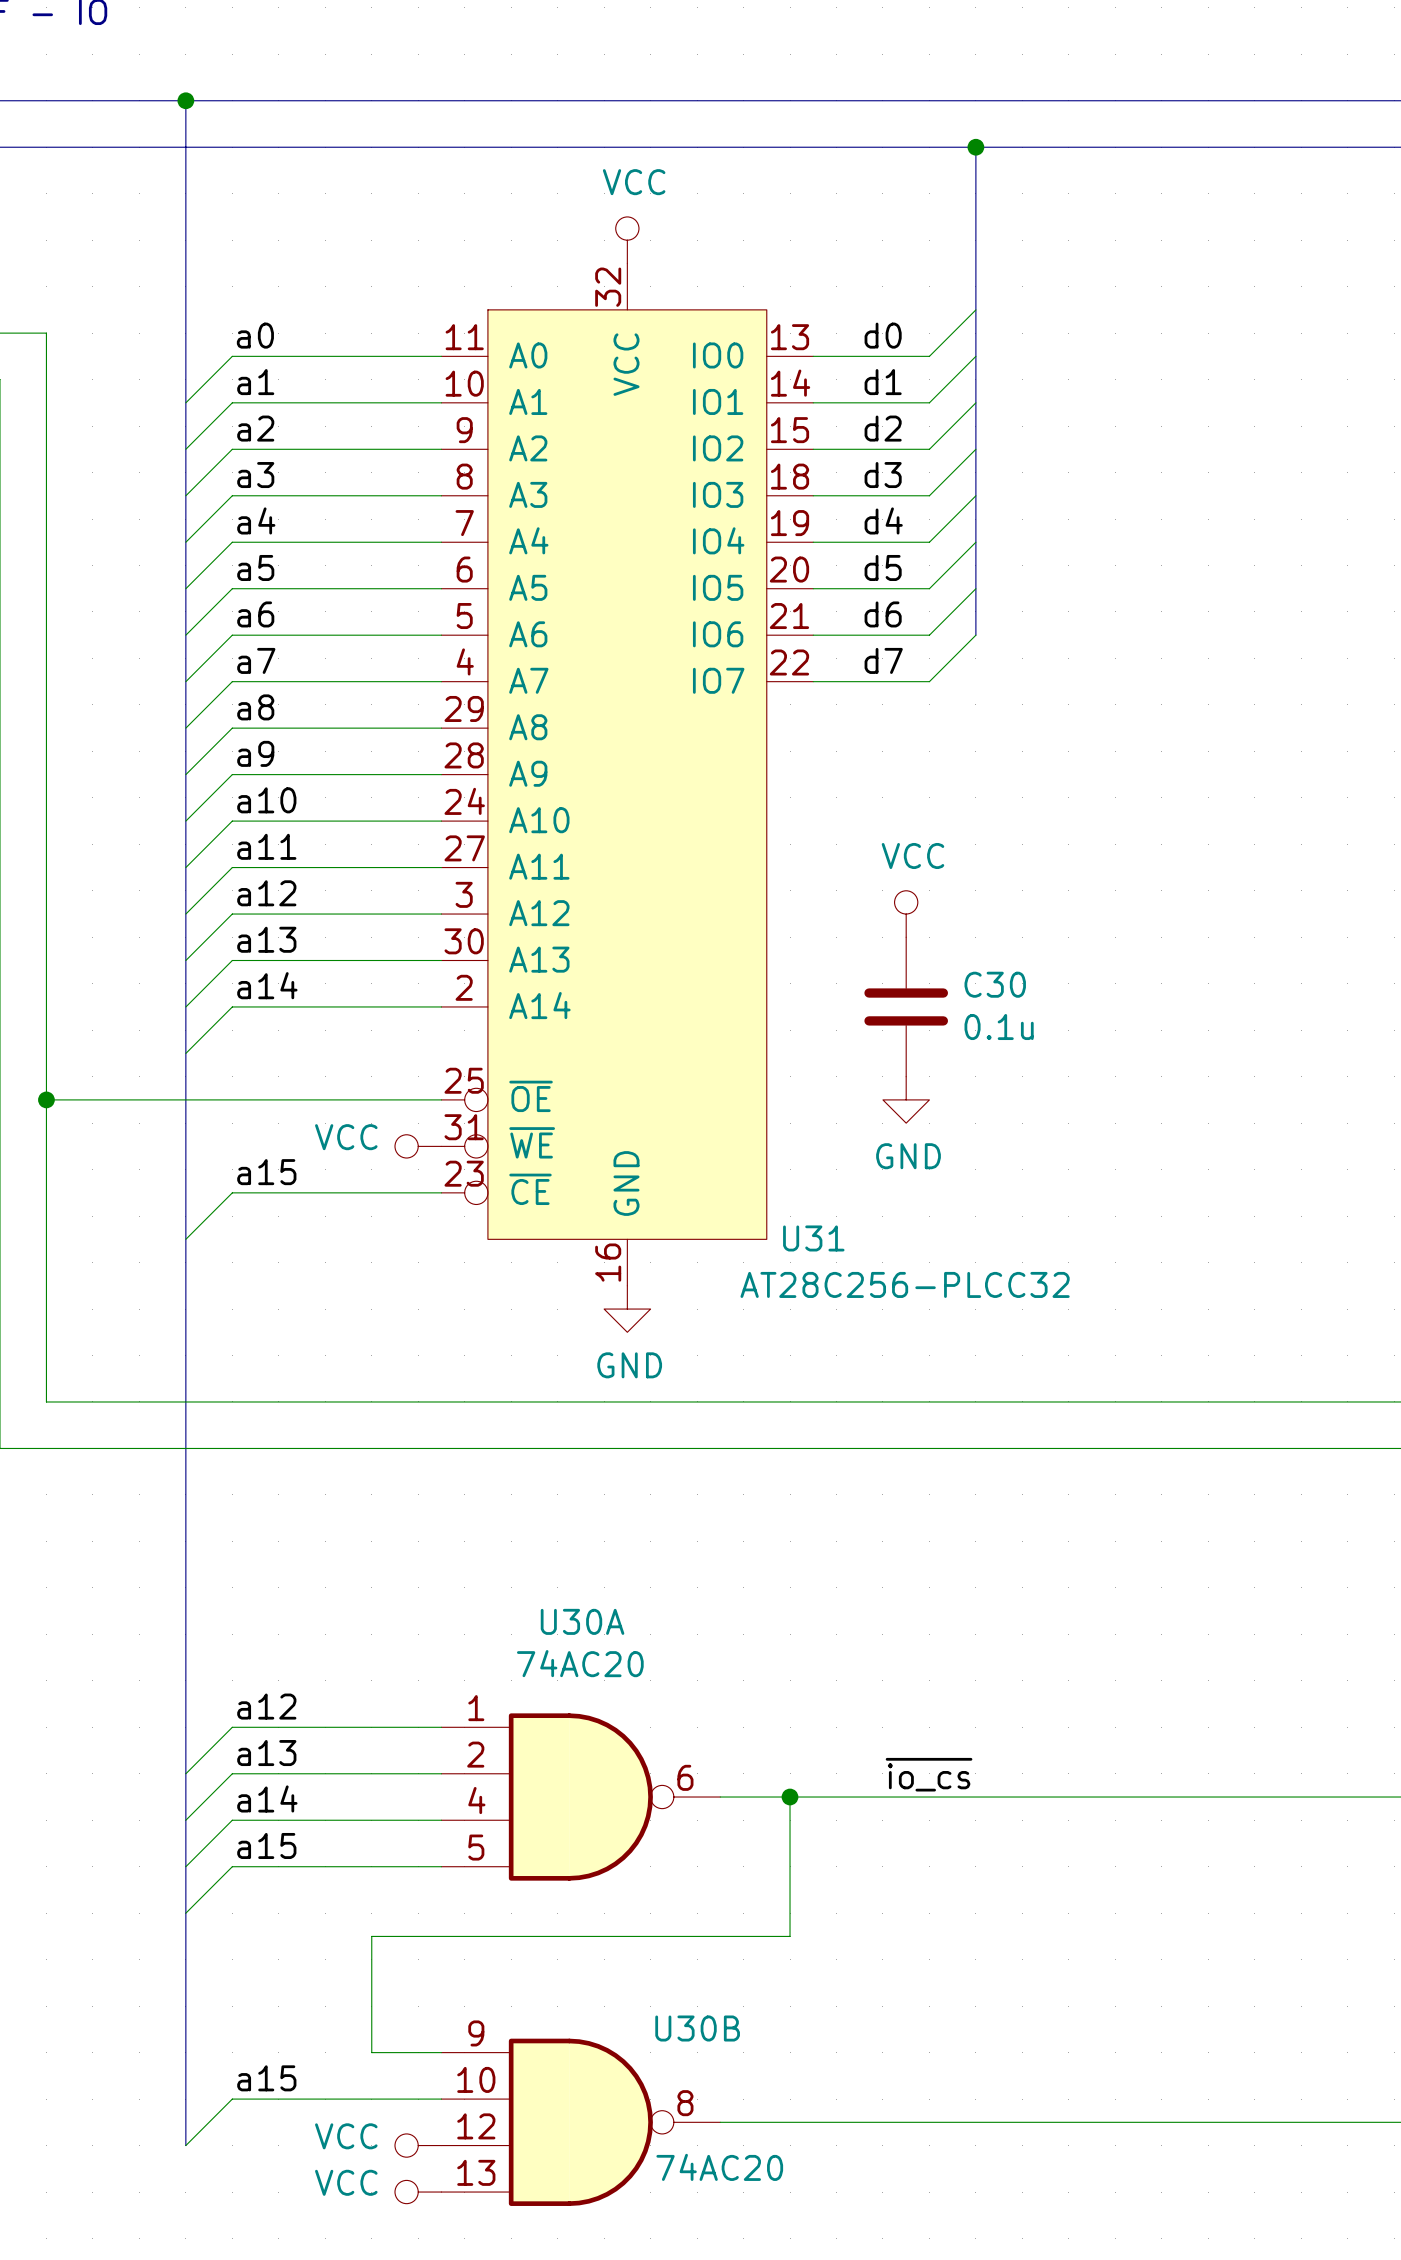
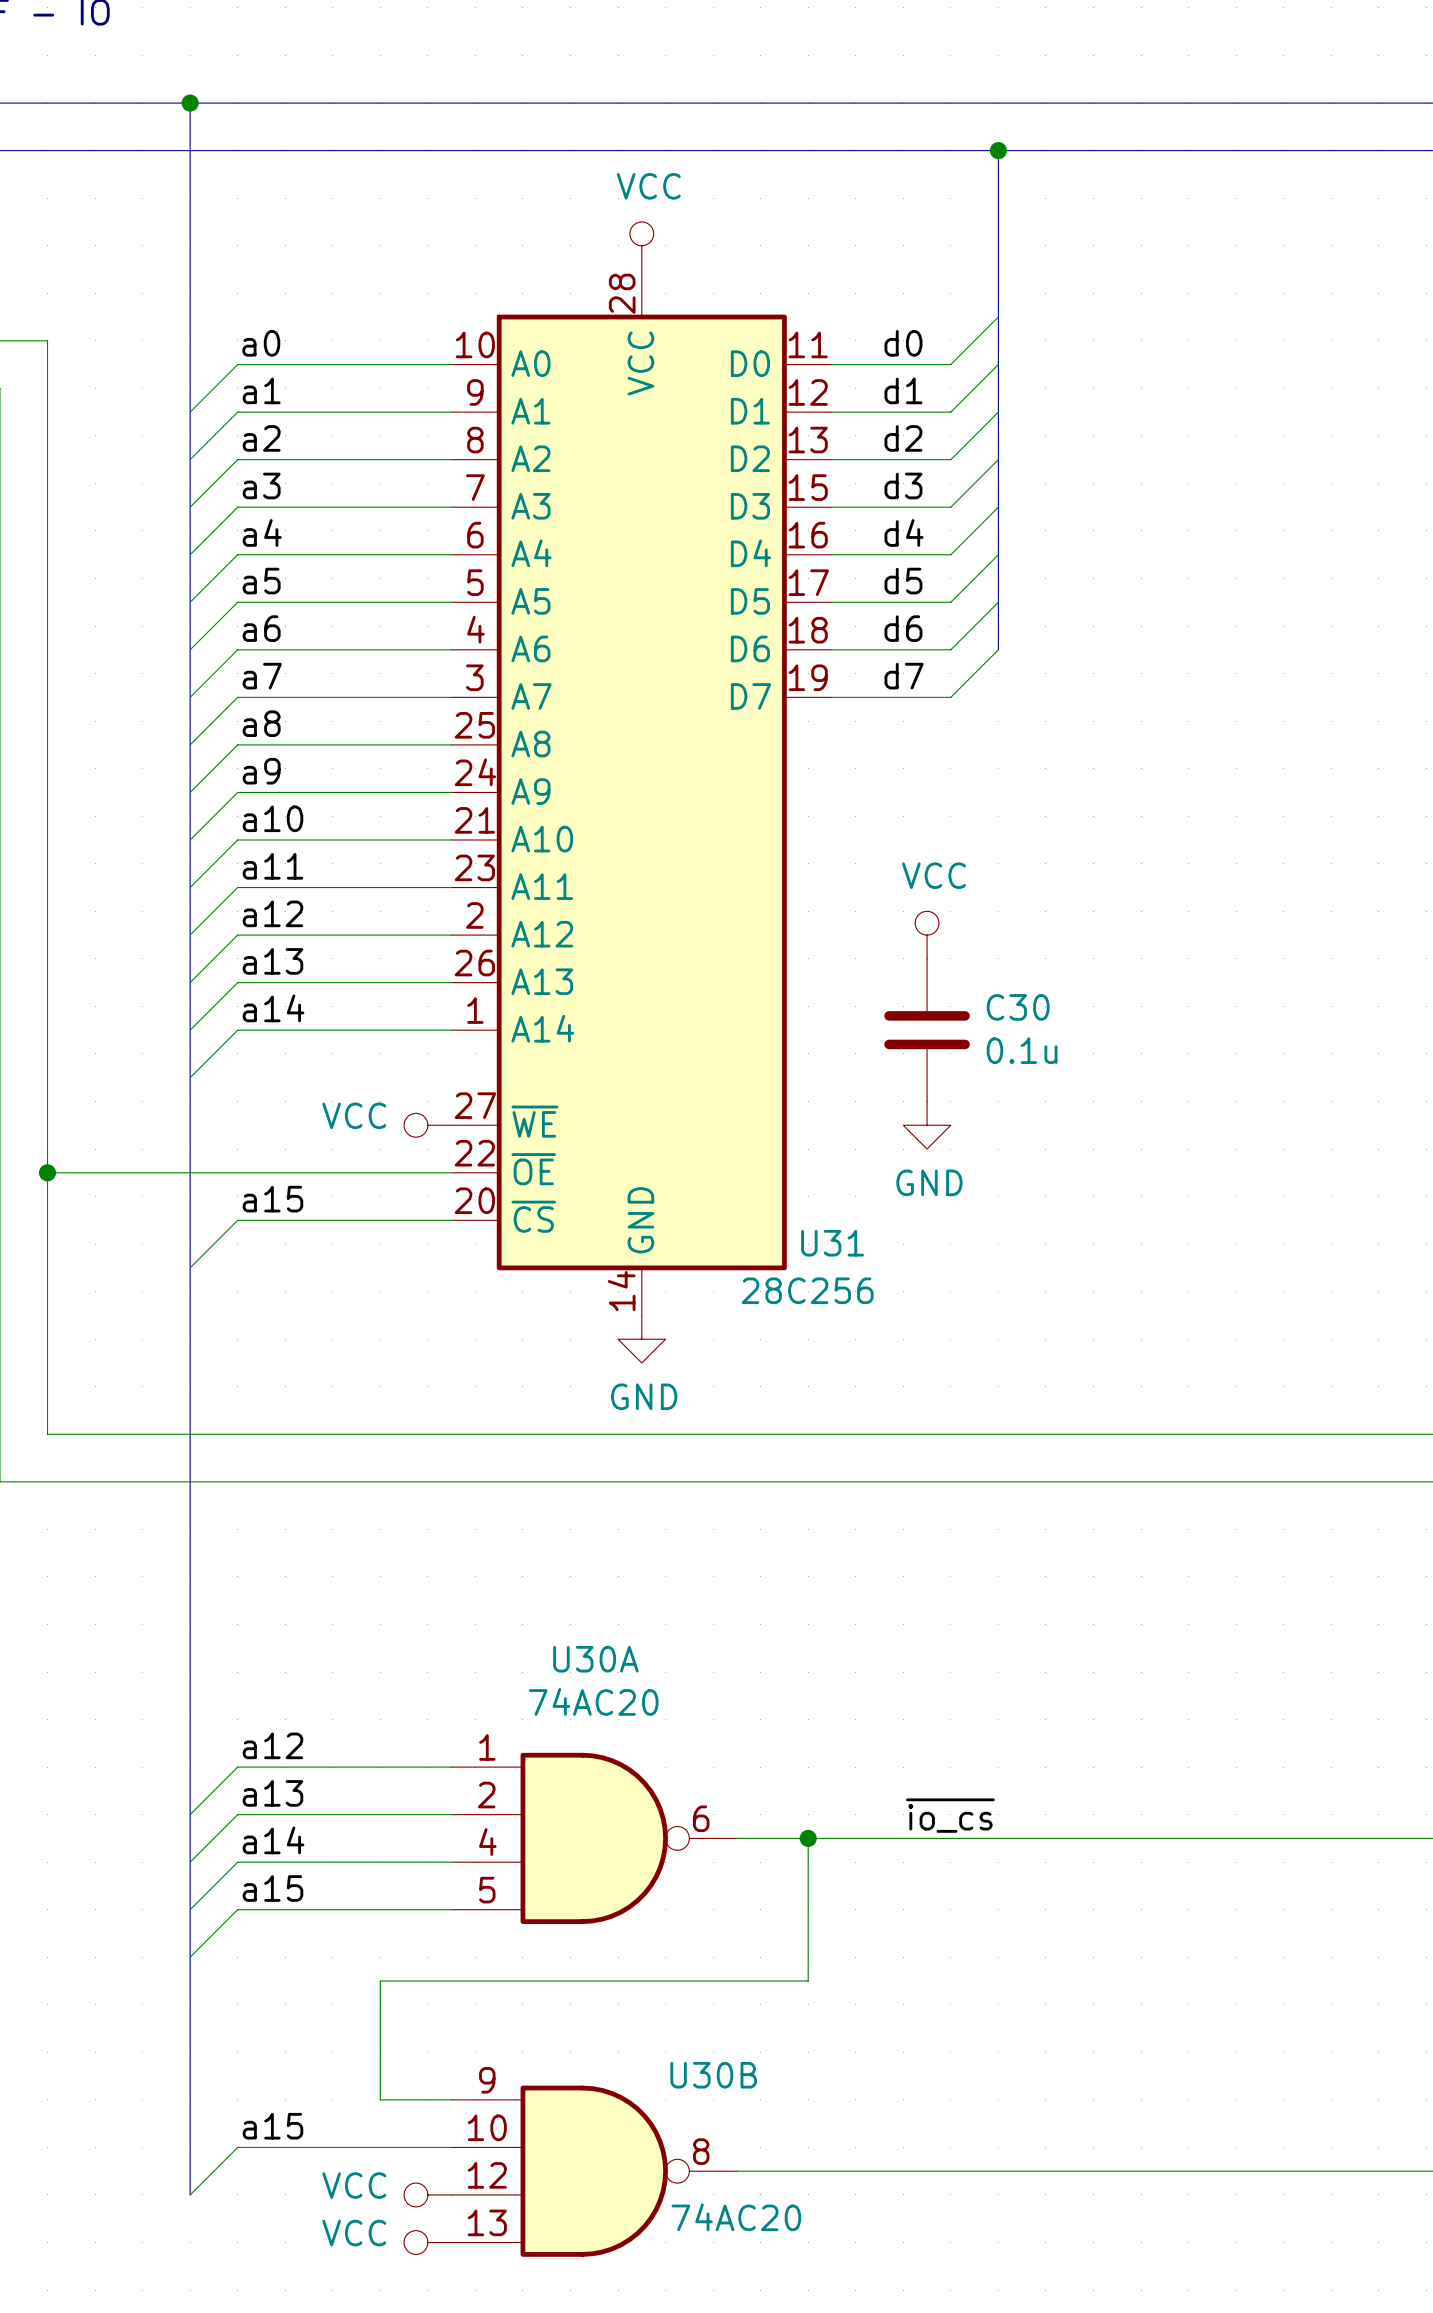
U31 symbol: [441, 263, 814, 1286] -> [451, 269, 832, 1316]
wire: (46, 1099) (441, 1099) -> (47, 1172) (451, 1172)
junction position: (46, 1099) -> (47, 1172)
power symbol position: VCC (418, 1146) -> VCC (427, 1125)
U31 value: AT28C256-PLCC32 (905, 1284) -> 28C256 (807, 1290)

